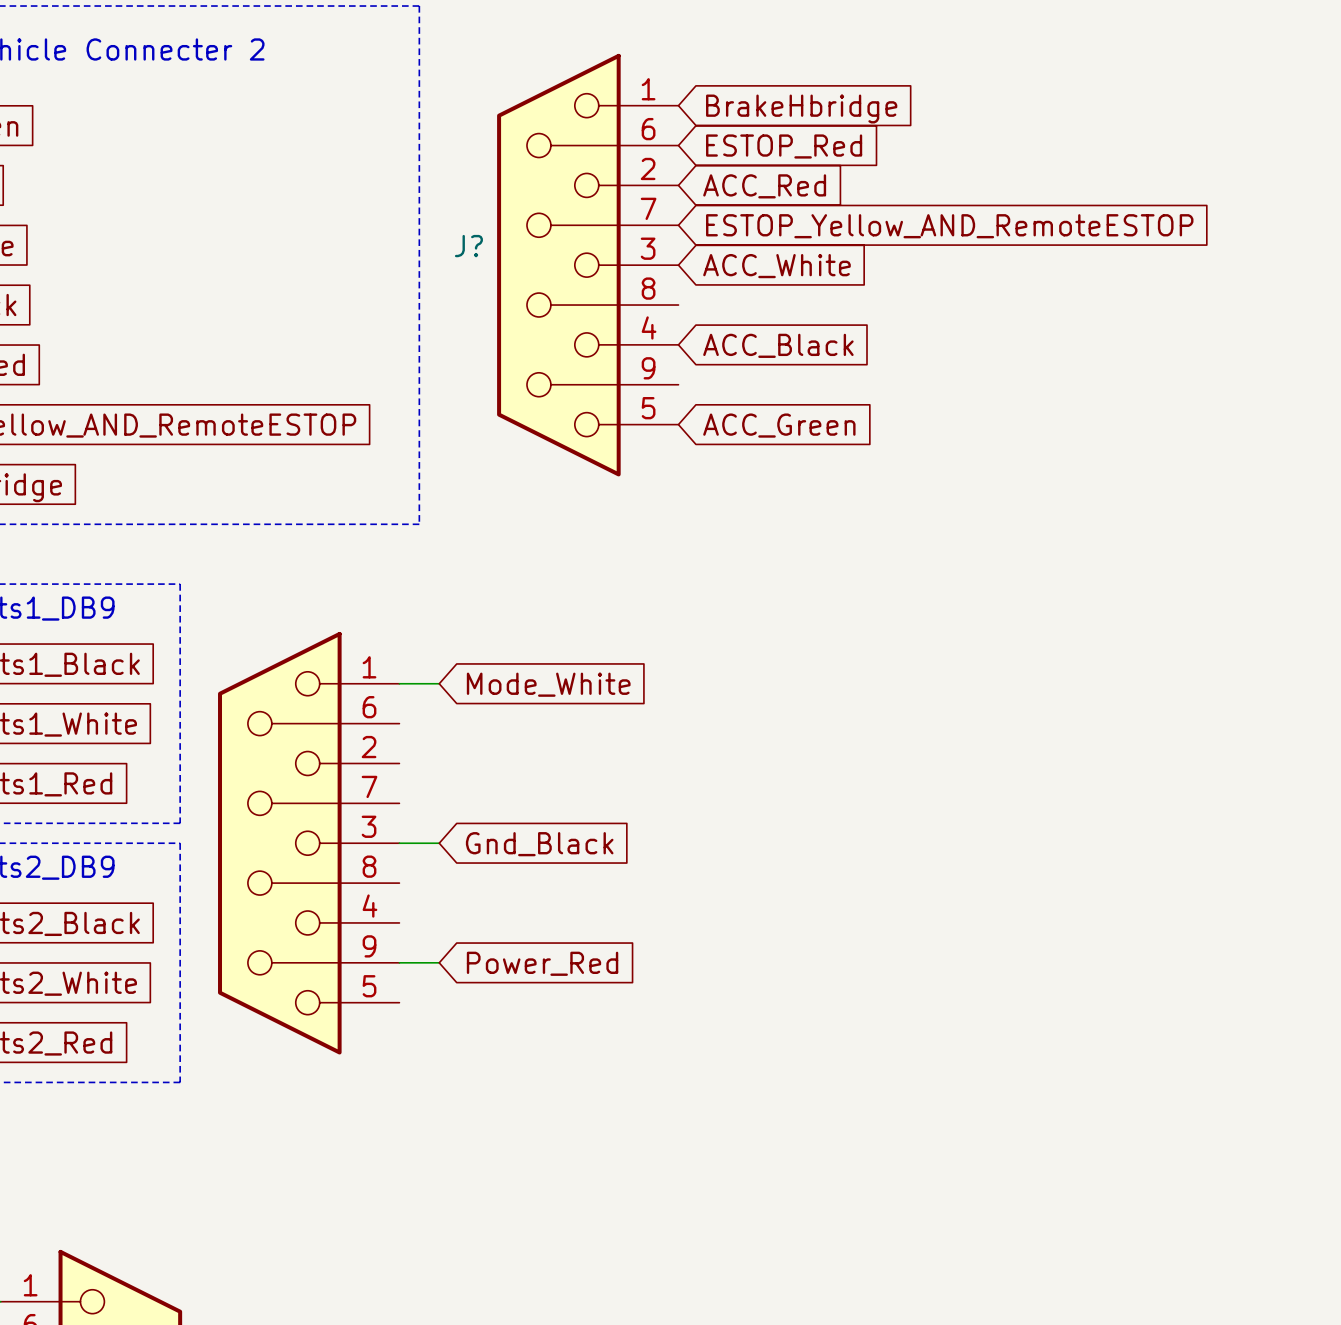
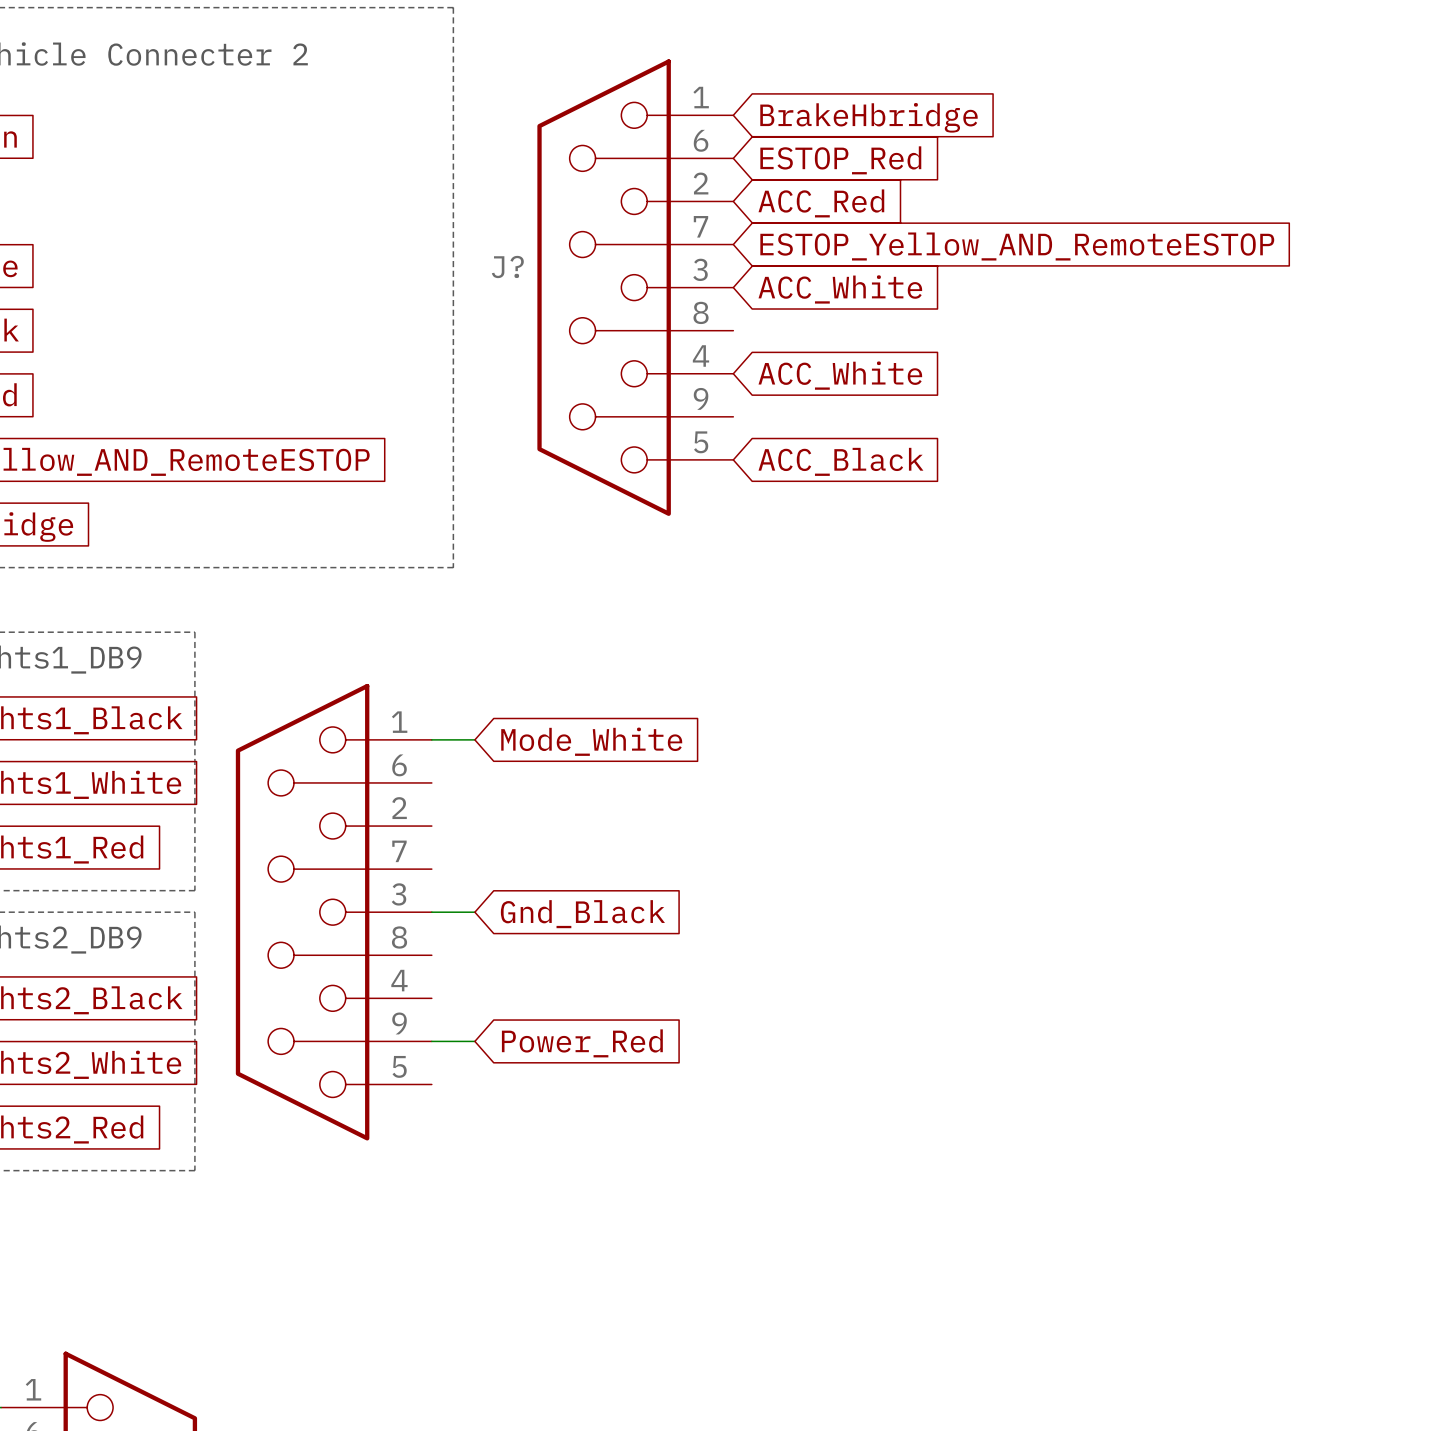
global label: ACC_Black (778, 345) -> ACC_White (840, 375)
global label: ACC_Green (779, 425) -> ACC_Black (840, 461)

